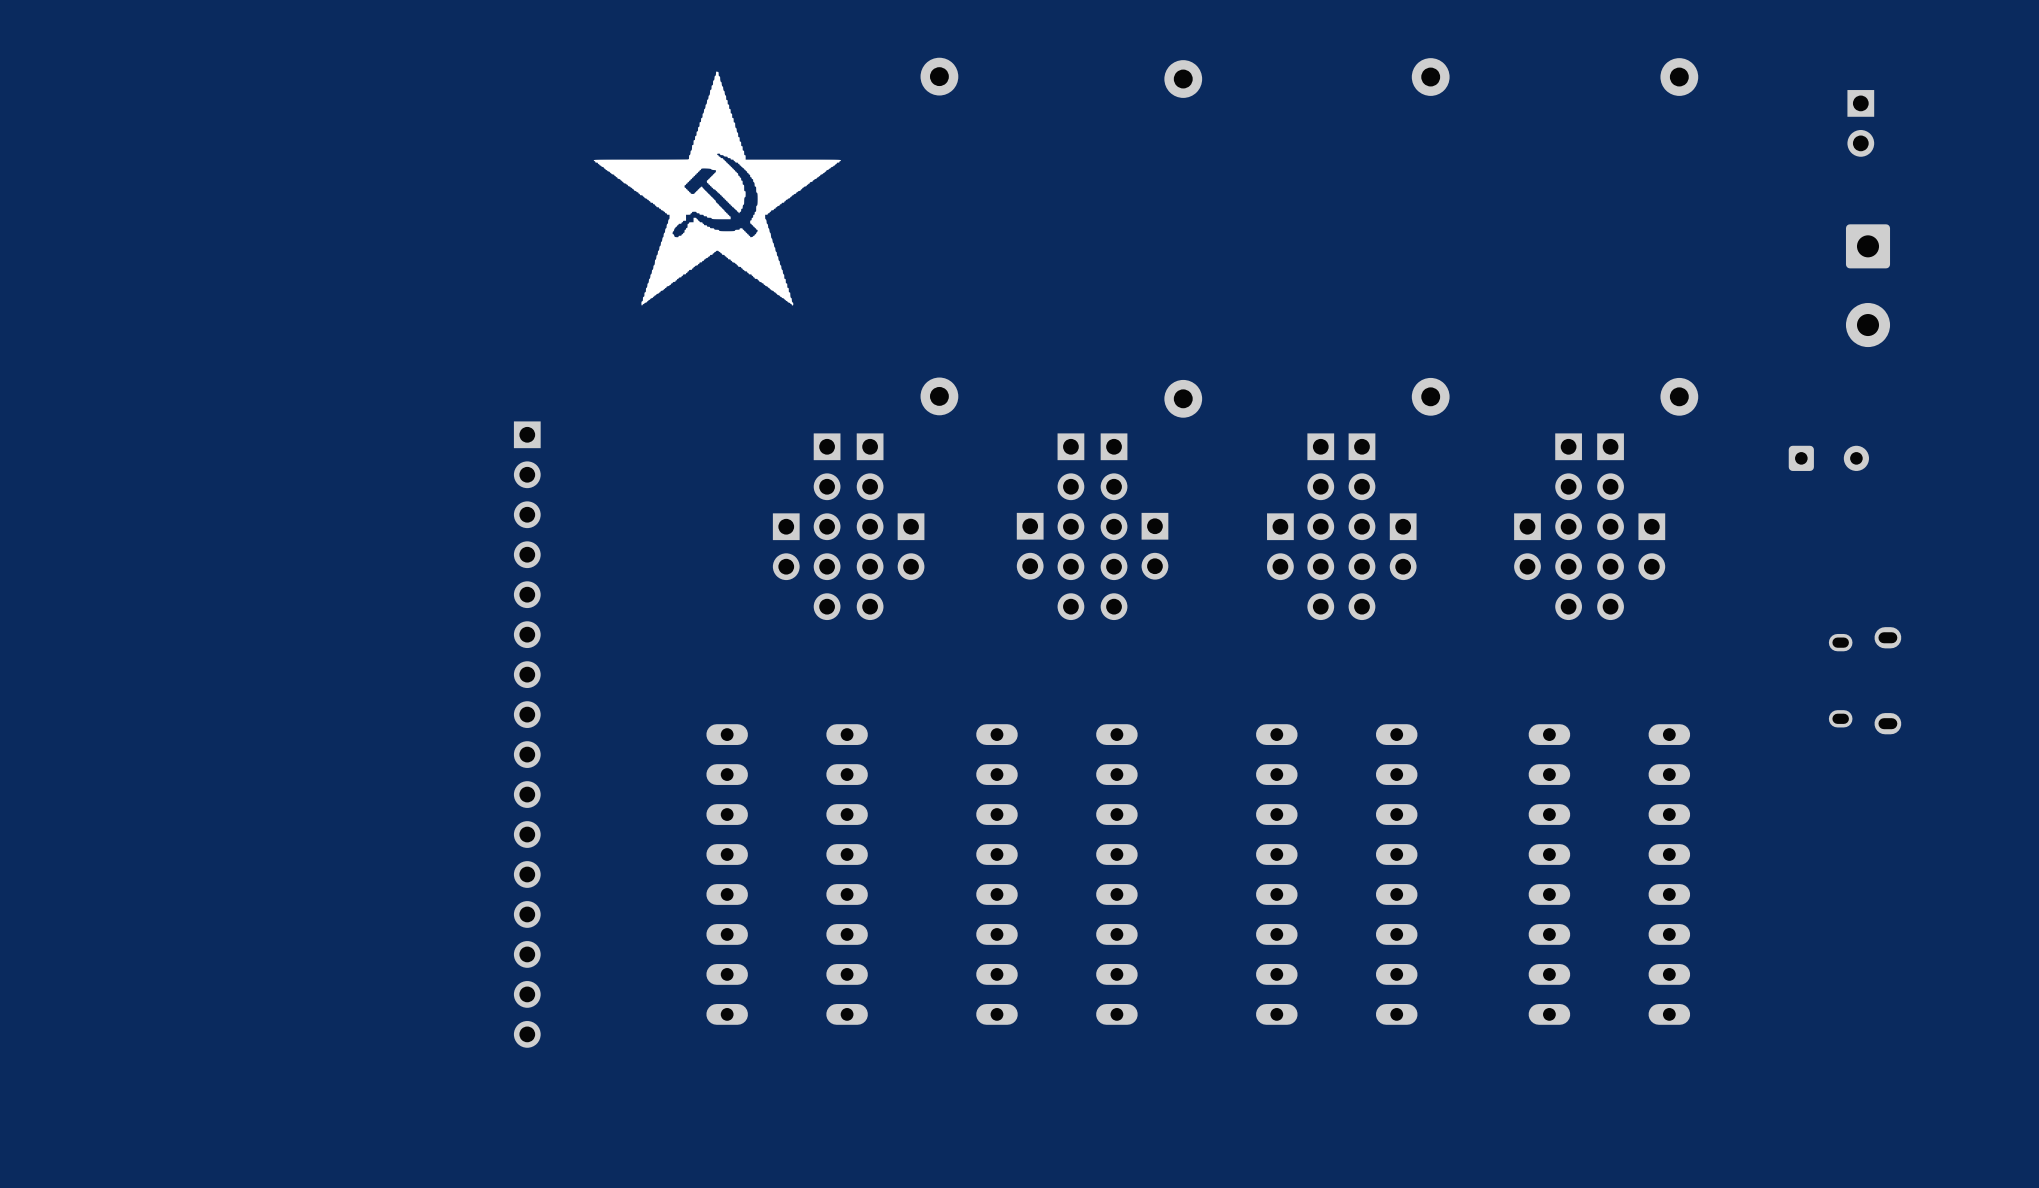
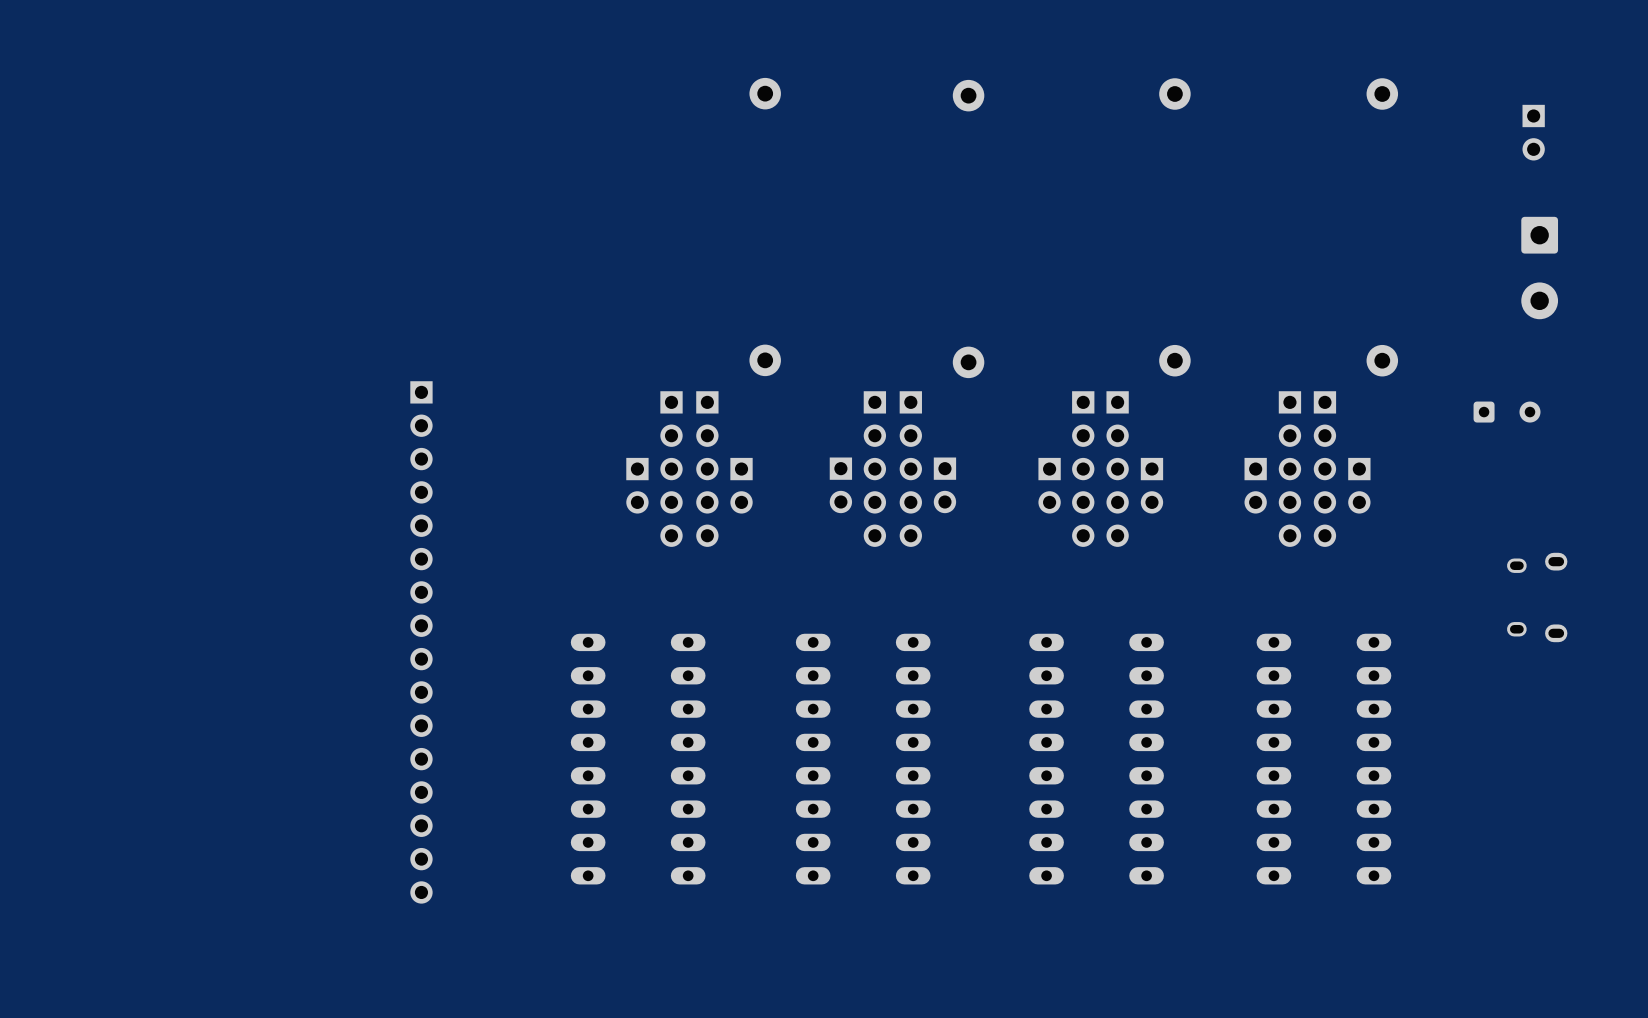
drawing: [593, 71, 841, 306] -> none

